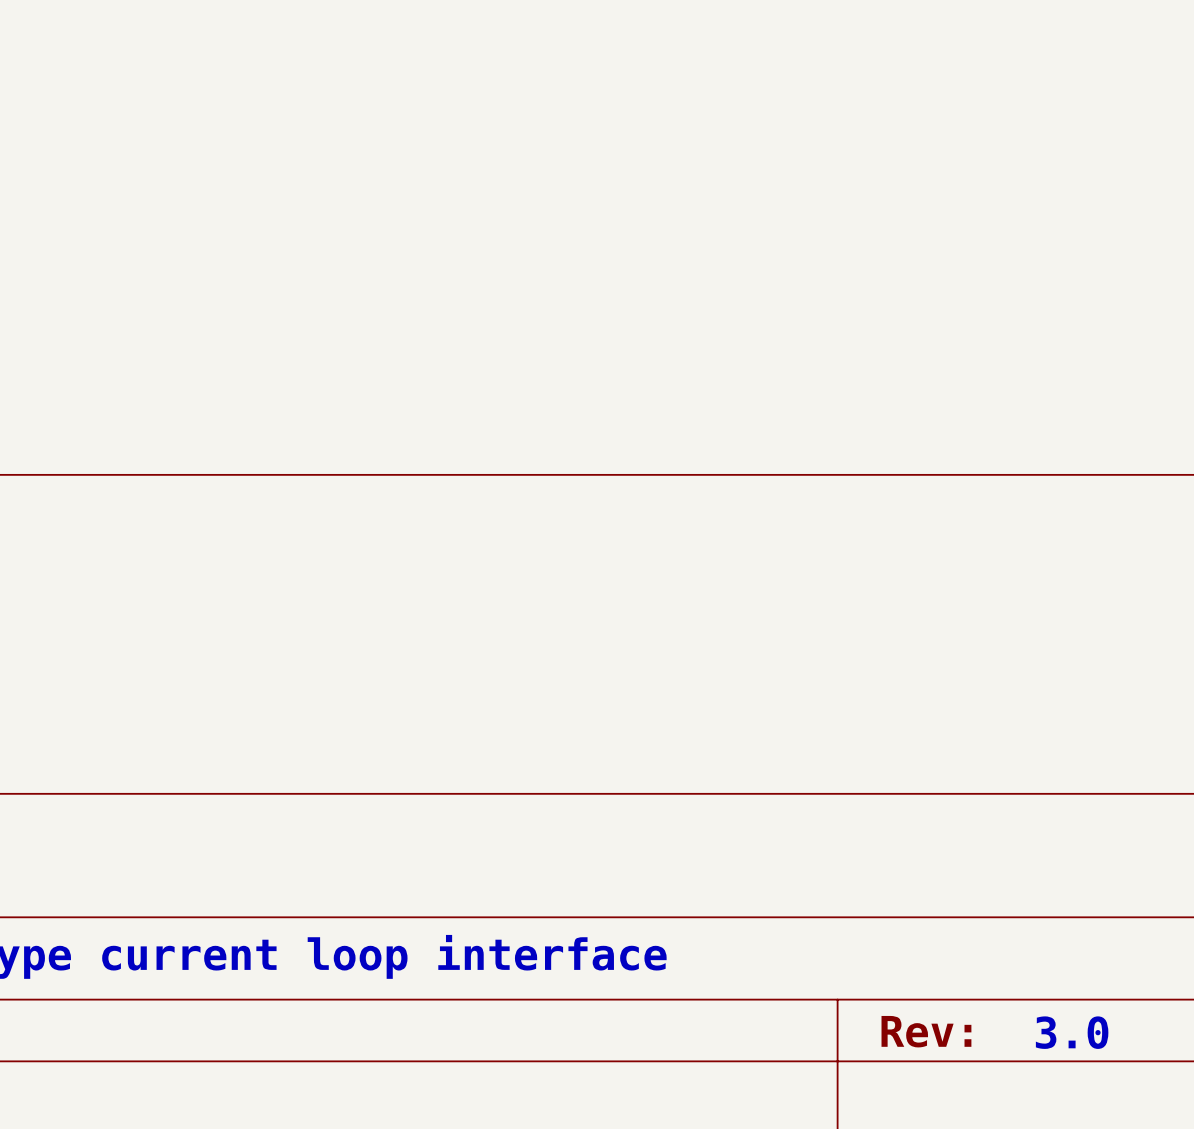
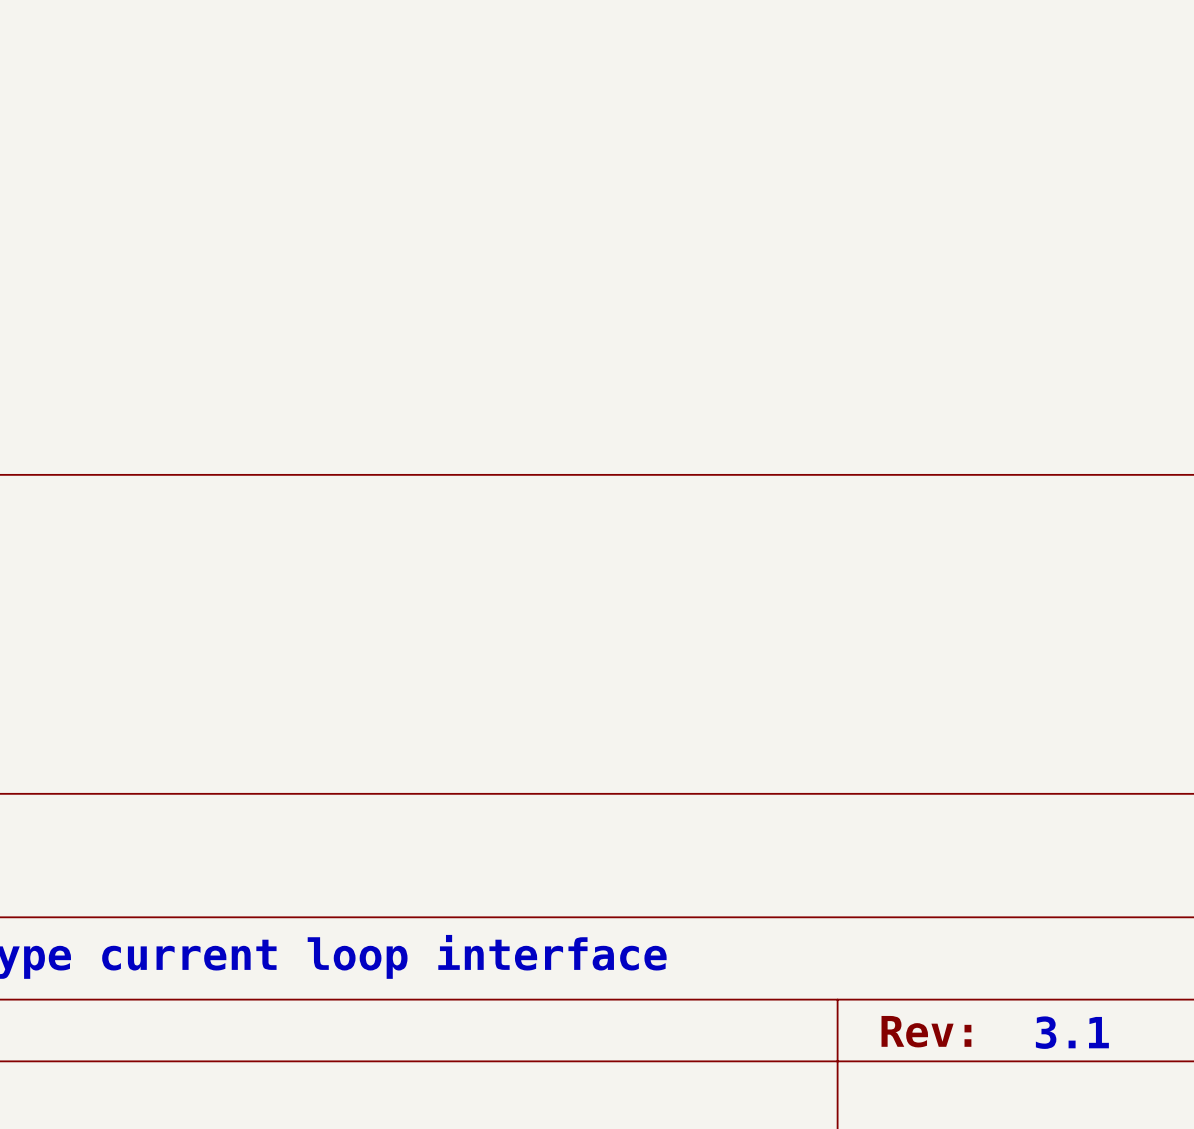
text: 3.0 (1072, 1032) -> 3.1 (1072, 1032)

